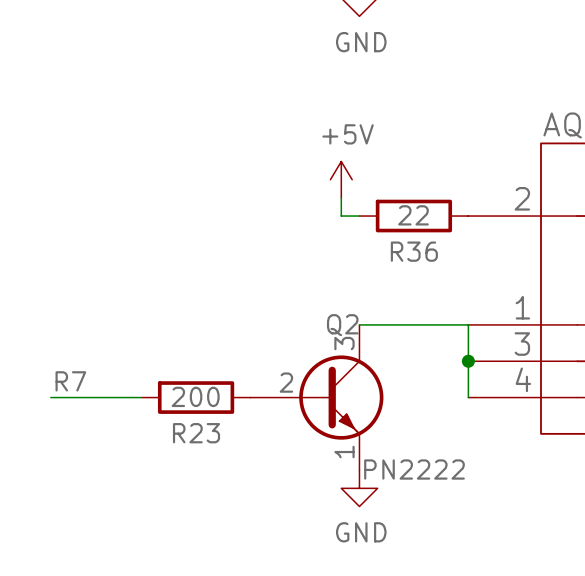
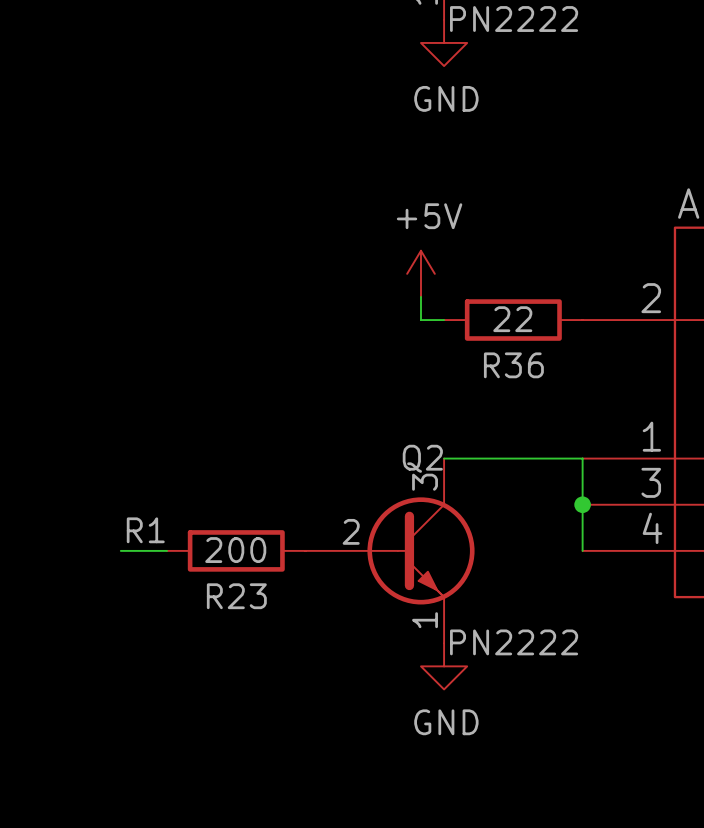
label: R7 (70, 381) -> none
label: none -> R1 (145, 530)
wire: (50, 397) (105, 397) -> none

